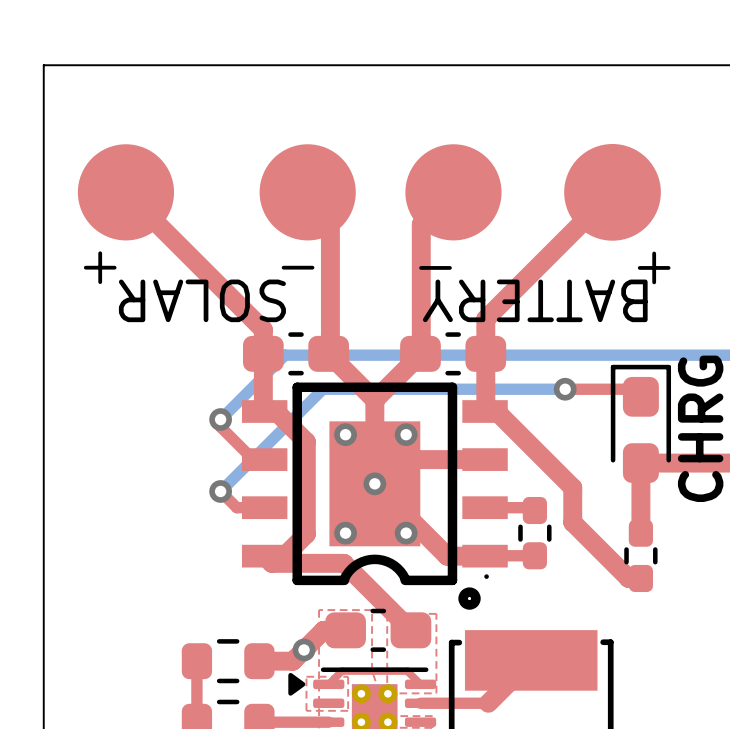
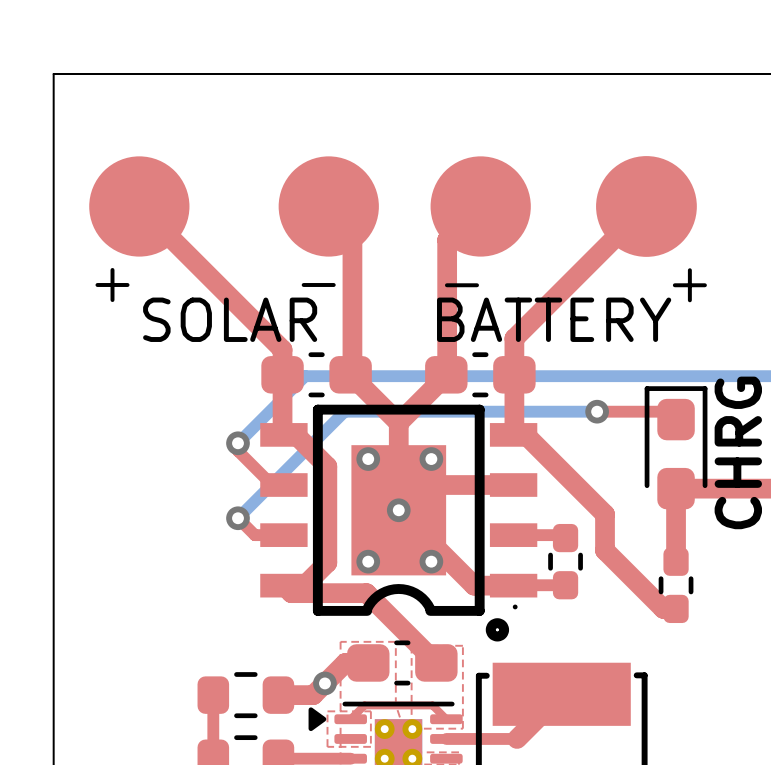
text rotation: 0° (202, 300) -> 180° (230, 319)
text rotation: 0° (535, 300) -> 180° (554, 319)

